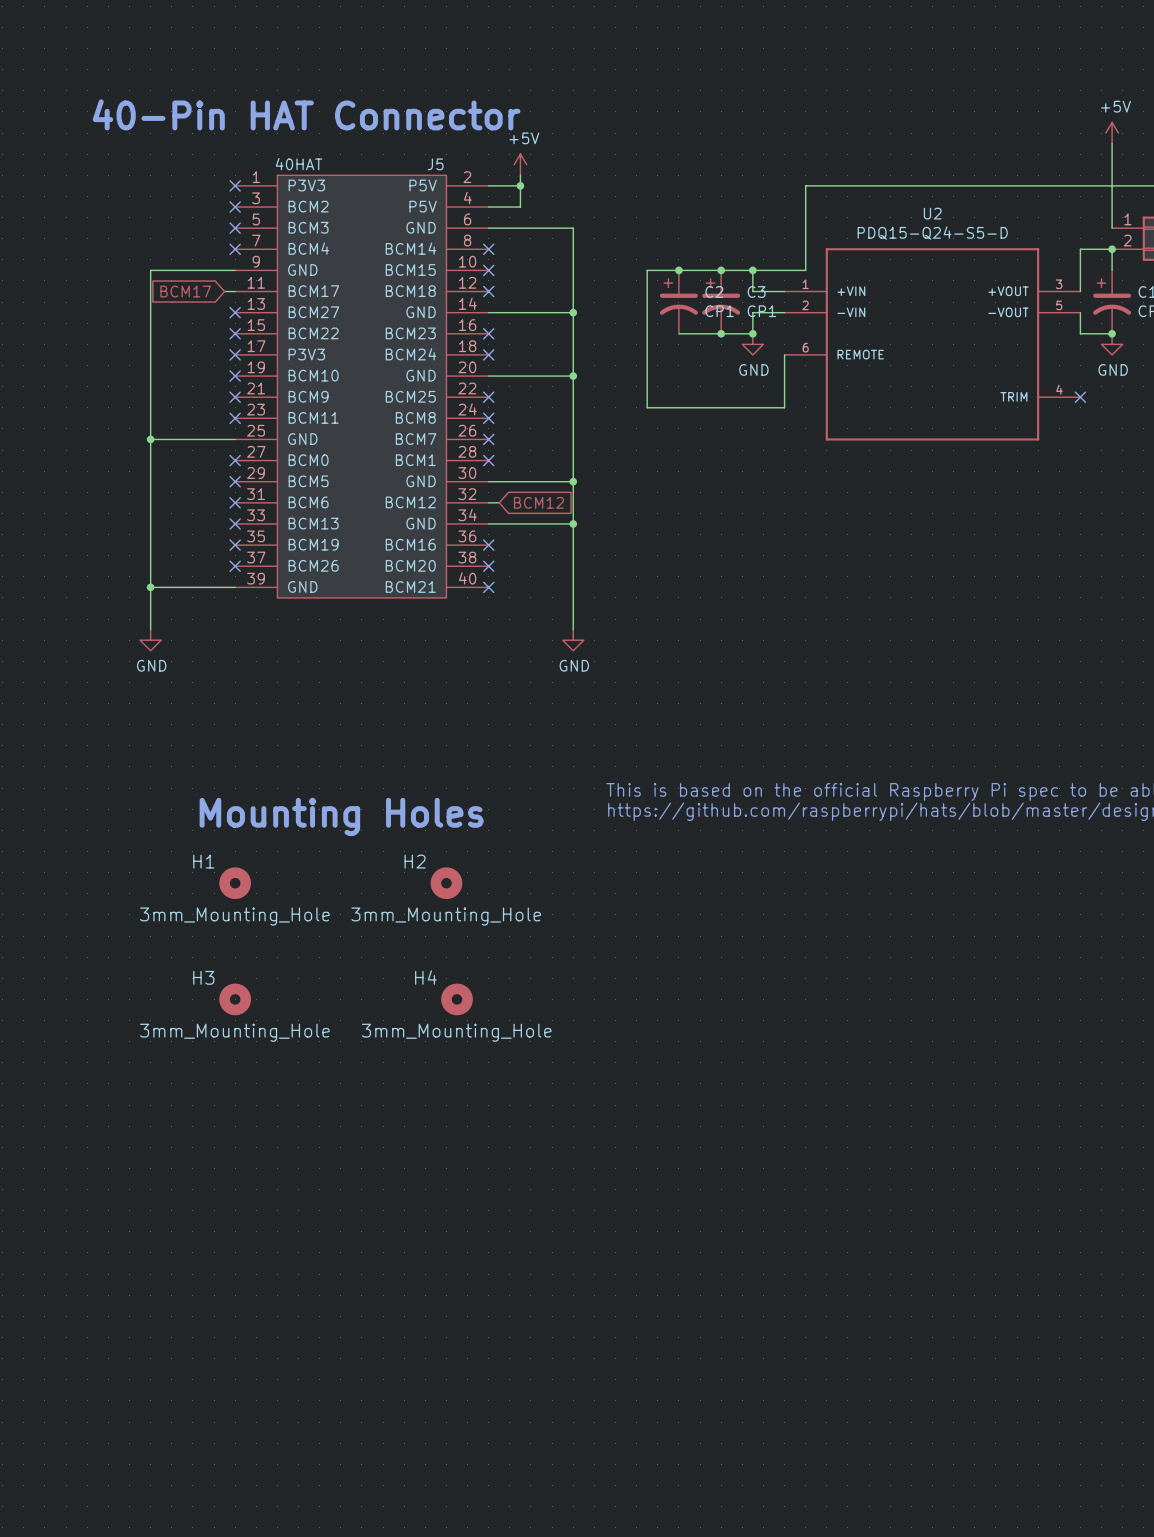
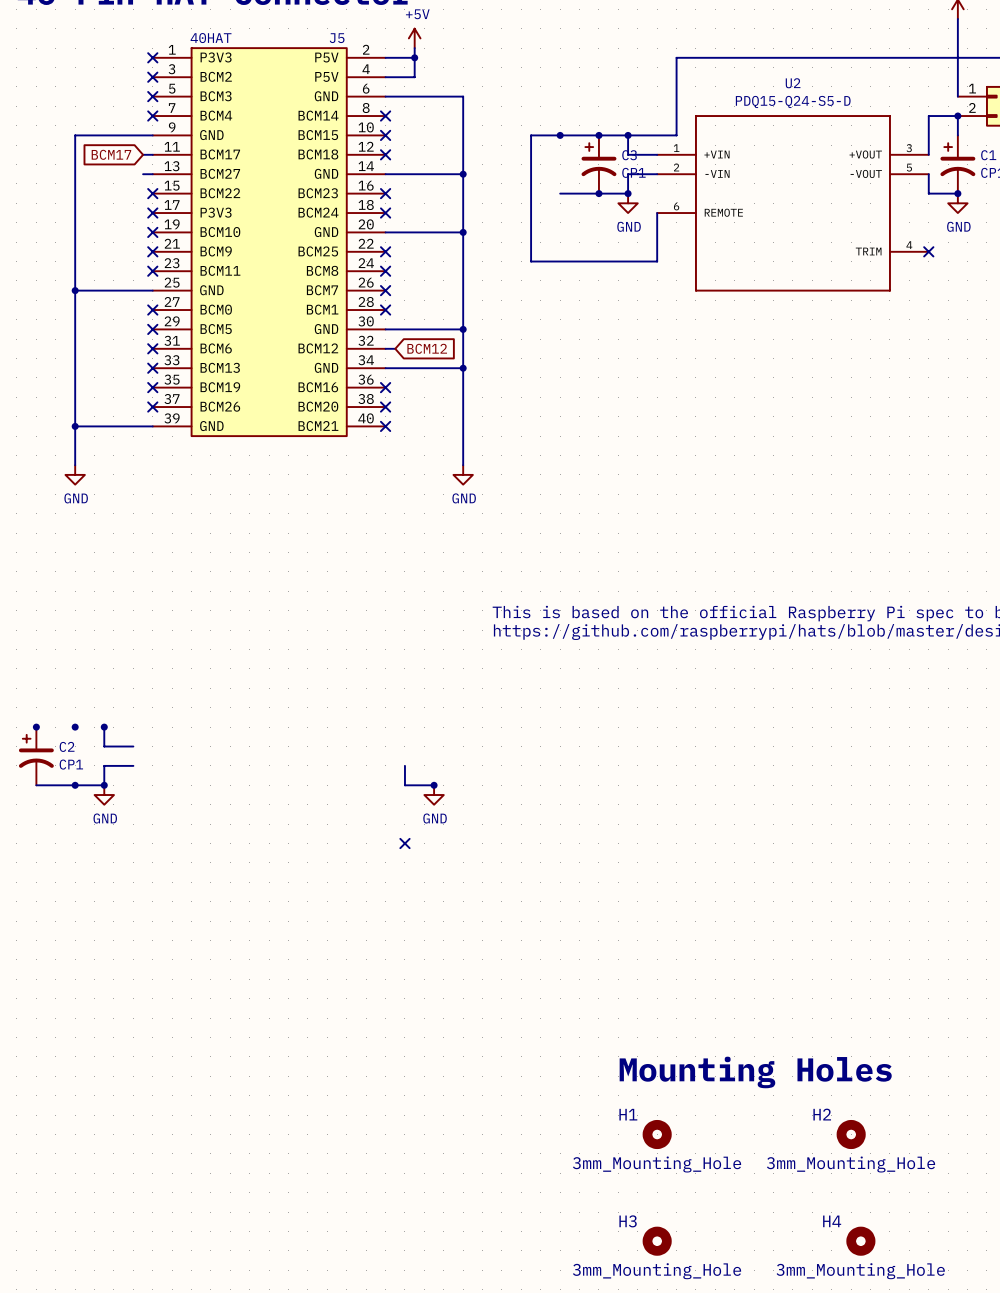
C2 position: (678, 302) -> (36, 756)
wire: none -> (143, 174) (152, 174)
no-connect mark: (235, 312) -> none
text: Mounting Holes (341, 816) -> none
H1 position: (235, 883) -> (657, 1134)
H2 position: (446, 883) -> (851, 1134)
junction: none -> (36, 727)
junction: none -> (75, 727)
wire: none -> (104, 727) (104, 746) (133, 746)
junction: none -> (104, 727)
wire: none -> (133, 765) (104, 765) (104, 785) (36, 785)
wire: none -> (404, 765) (404, 785) (434, 785)
junction: none -> (75, 785)
junction: none -> (104, 785)
junction: none -> (434, 785)
power symbol: none -> GND (104, 795)
power symbol: none -> GND (434, 795)
H3 position: (235, 999) -> (657, 1241)
H4 position: (457, 999) -> (860, 1241)
no-connect mark: none -> (404, 843)
text: none -> Mounting Holes (755, 1072)

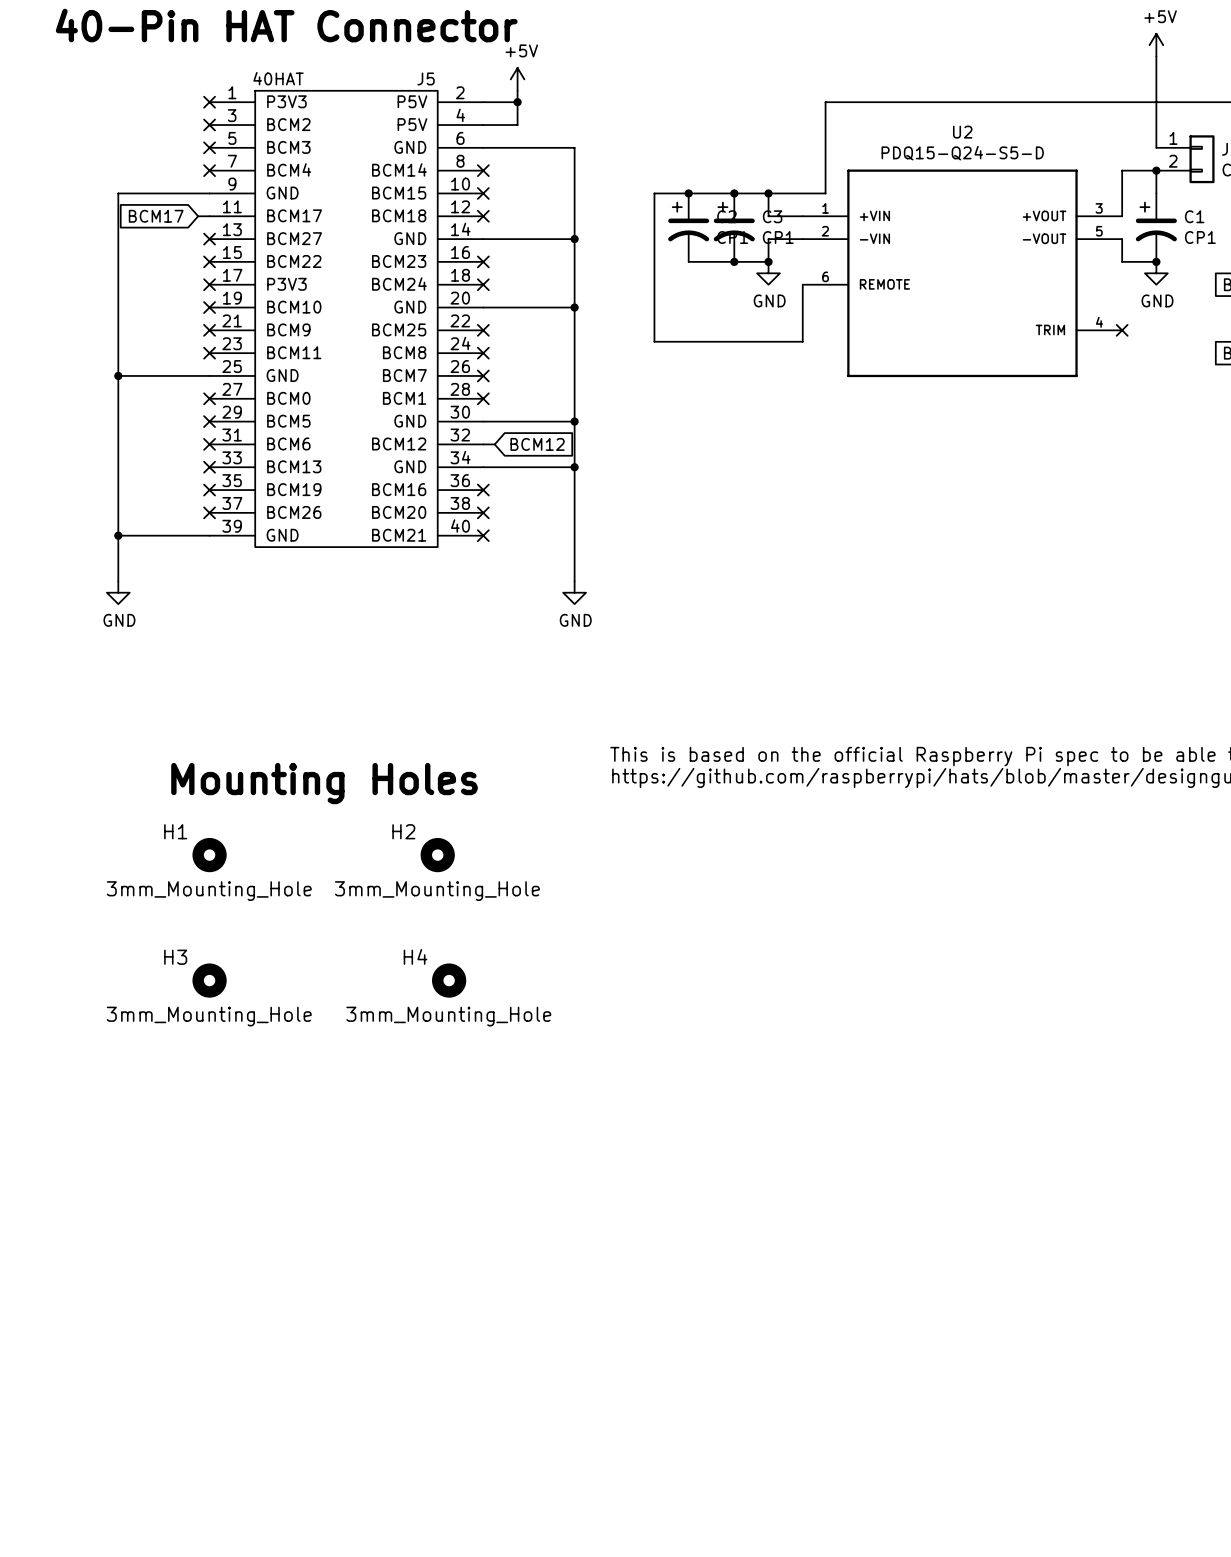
wire: (143, 174) (152, 174) -> none
no-connect mark: none -> (209, 239)
text: none -> Mounting Holes (324, 783)
junction: (36, 727) -> none
junction: (75, 727) -> none
wire: (104, 727) (104, 746) (133, 746) -> none
junction: (104, 727) -> none
C2 position: (36, 756) -> (688, 227)
wire: (133, 765) (104, 765) (104, 785) (36, 785) -> none
wire: (404, 765) (404, 785) (434, 785) -> none
junction: (75, 785) -> none
junction: (104, 785) -> none
junction: (434, 785) -> none
power symbol: GND (104, 795) -> none
power symbol: GND (434, 795) -> none
no-connect mark: (404, 843) -> none
text: Mounting Holes (755, 1072) -> none
H1 position: (657, 1134) -> (209, 855)
H2 position: (851, 1134) -> (437, 855)
H3 position: (657, 1241) -> (209, 980)
H4 position: (860, 1241) -> (449, 980)

